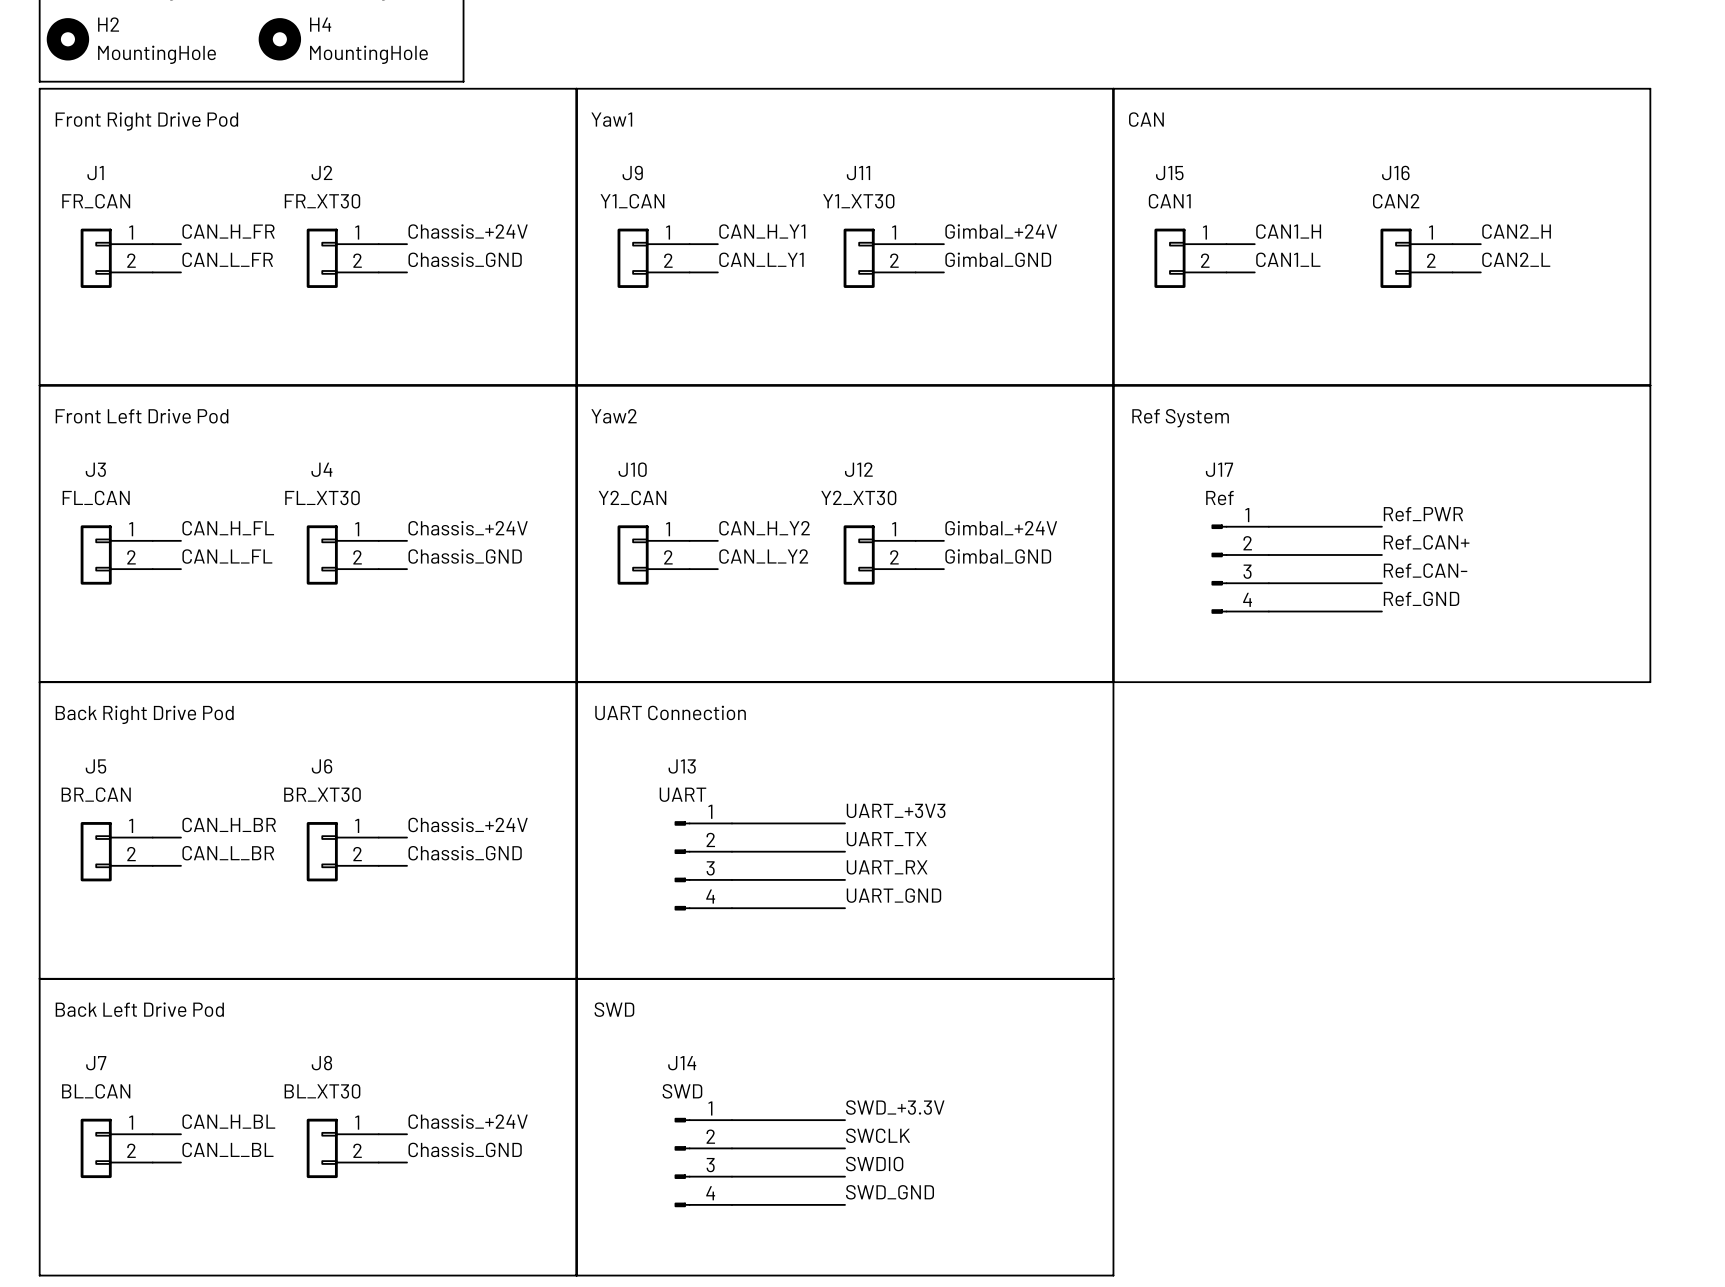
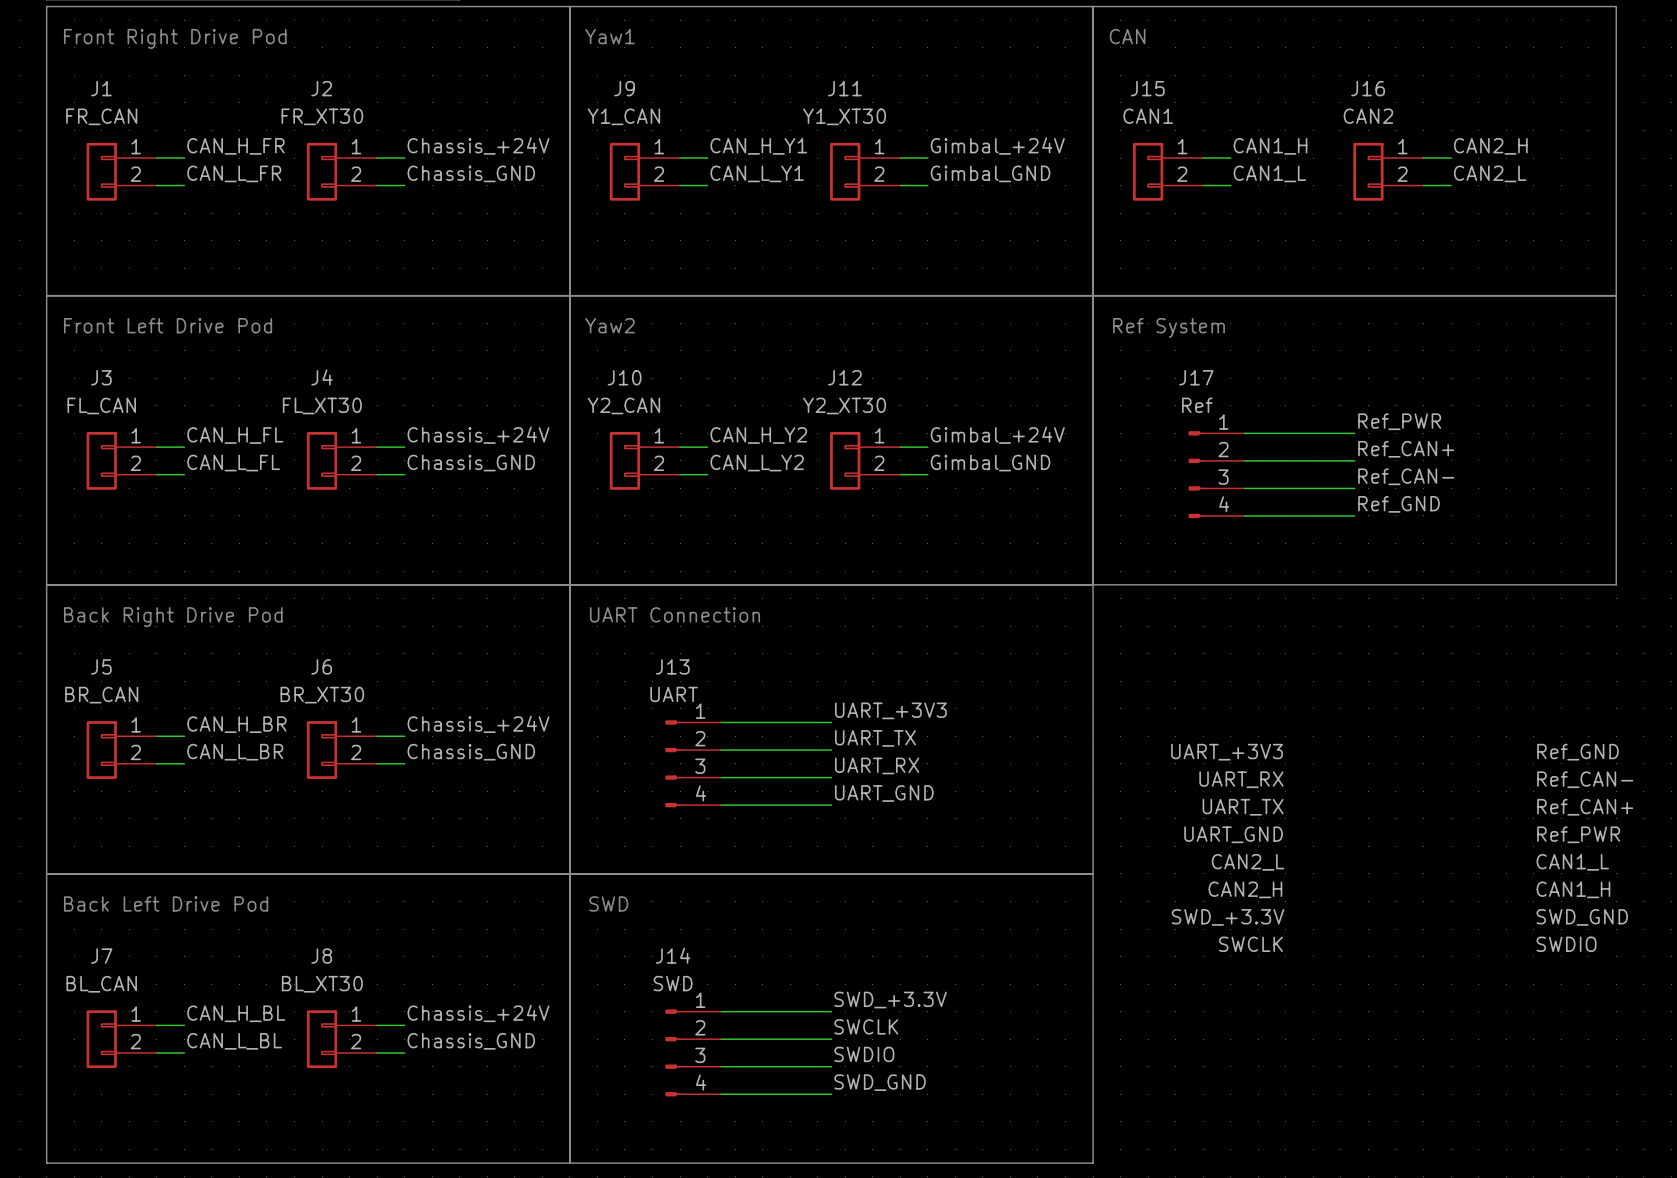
label: none -> UART_+3V3 (1227, 752)
label: none -> Ref_GND (1578, 752)
label: none -> UART_RX (1241, 779)
label: none -> Ref_CAN- (1585, 779)
label: none -> UART_TX (1243, 807)
label: none -> Ref_CAN+ (1585, 807)
label: none -> UART_GND (1233, 834)
label: none -> Ref_PWR (1578, 834)
label: none -> CAN2_L (1248, 862)
label: none -> CAN1_L (1572, 862)
label: none -> CAN2_H (1245, 889)
label: none -> CAN1_H (1573, 889)
label: none -> SWD_+3.3V (1228, 917)
label: none -> SWD_GND (1582, 917)
label: none -> SWCLK (1250, 944)
label: none -> SWDIO (1566, 944)

